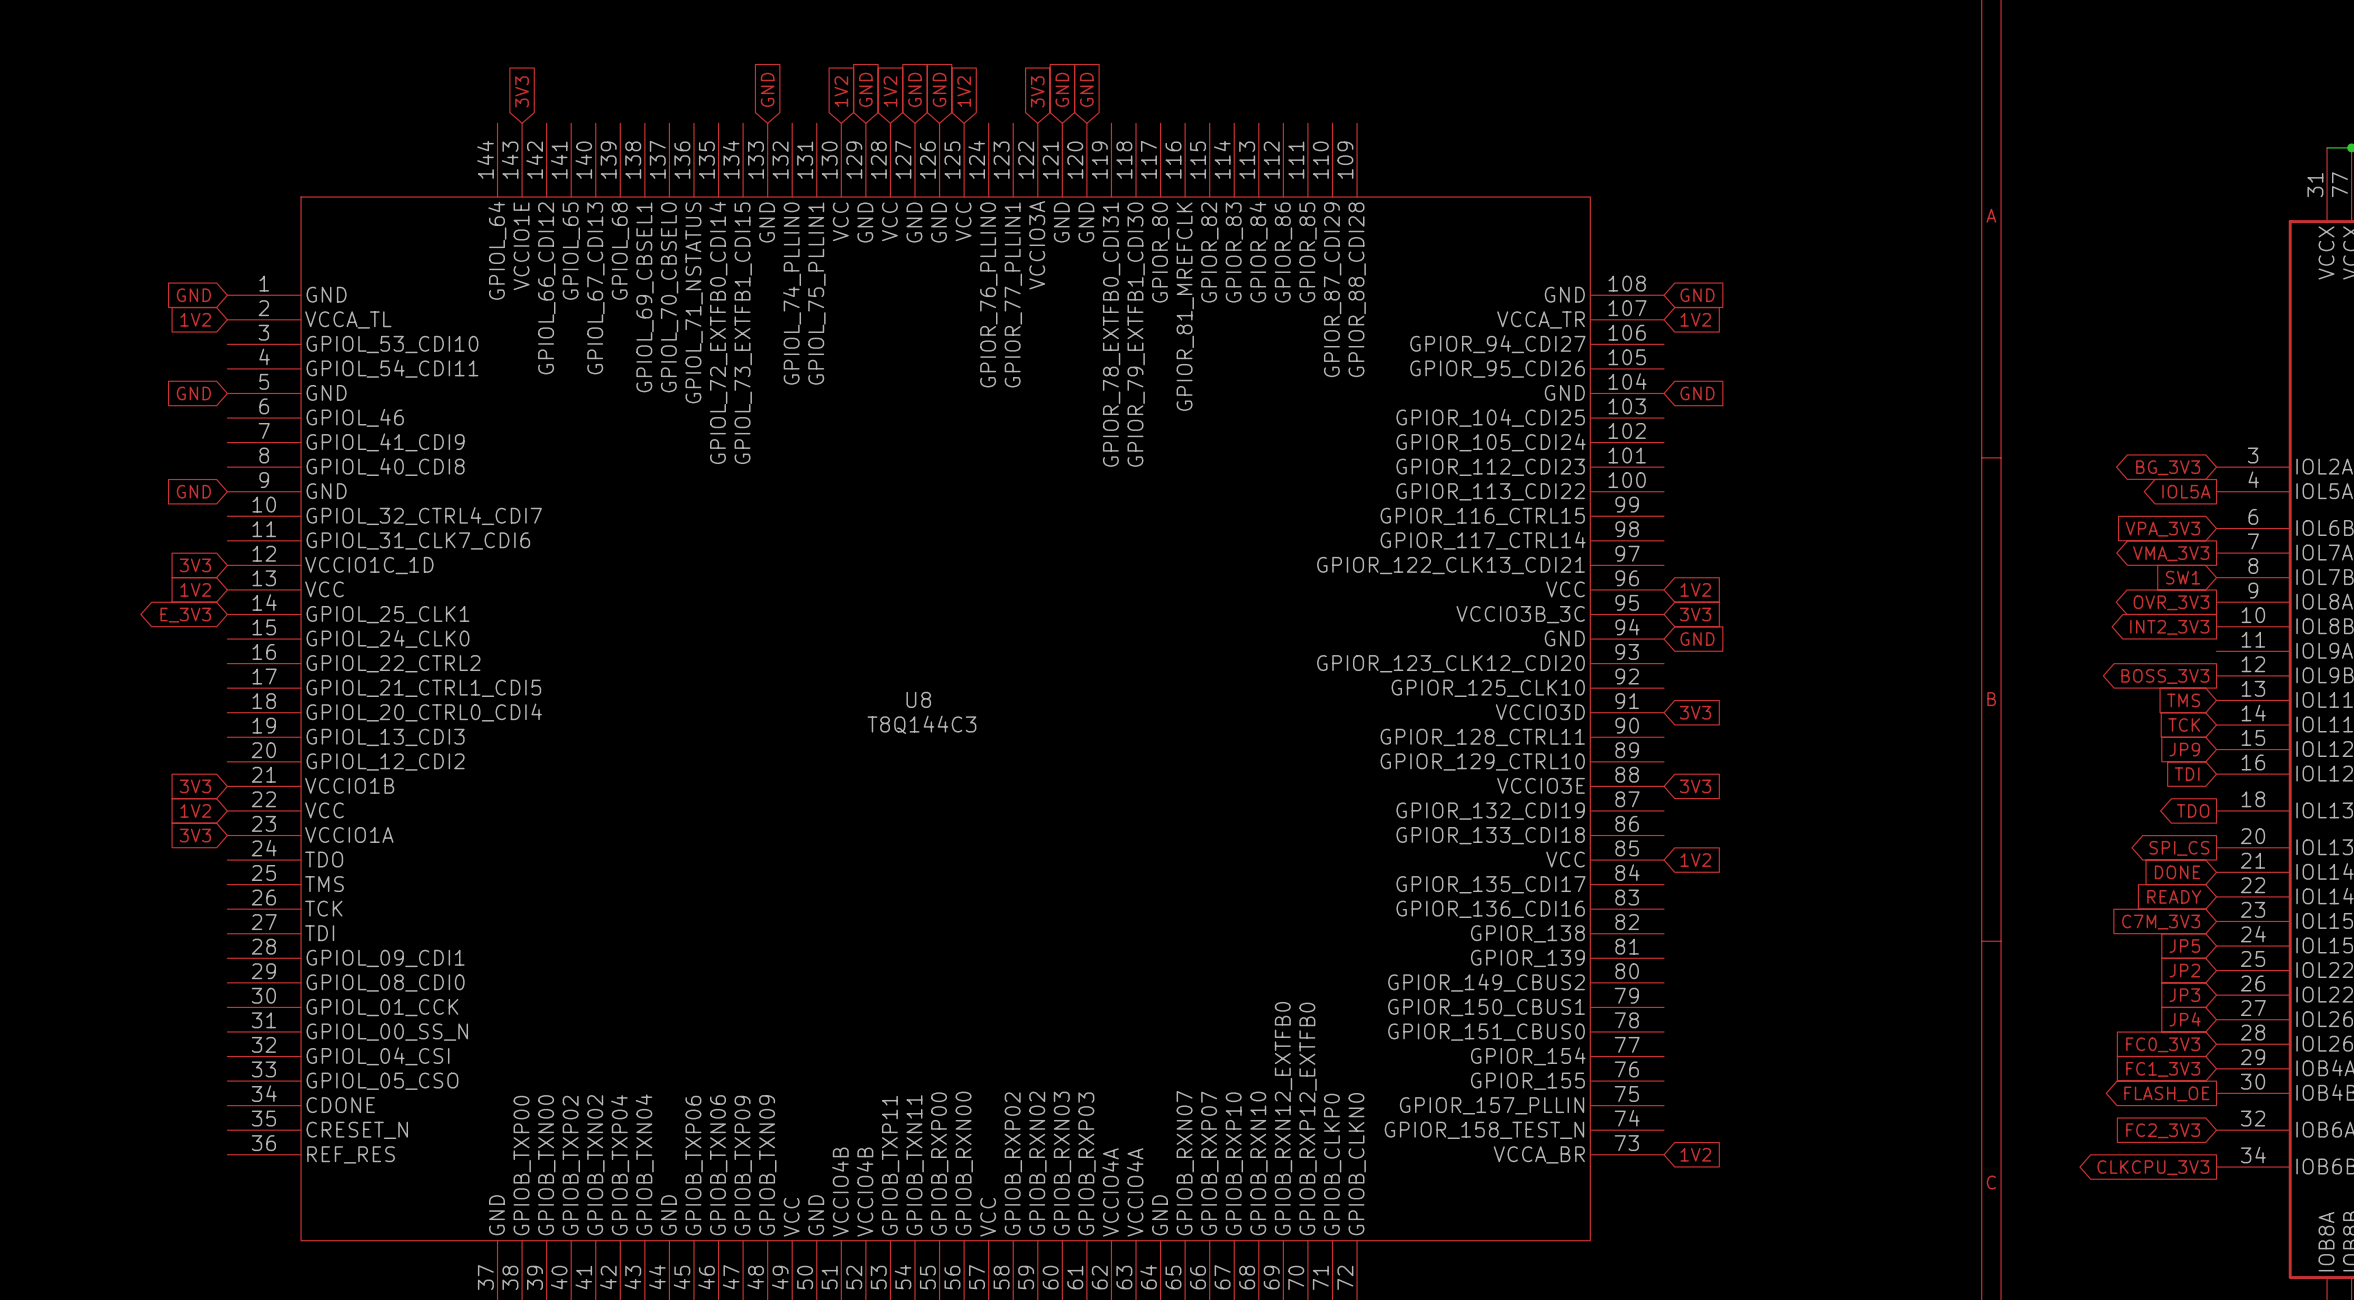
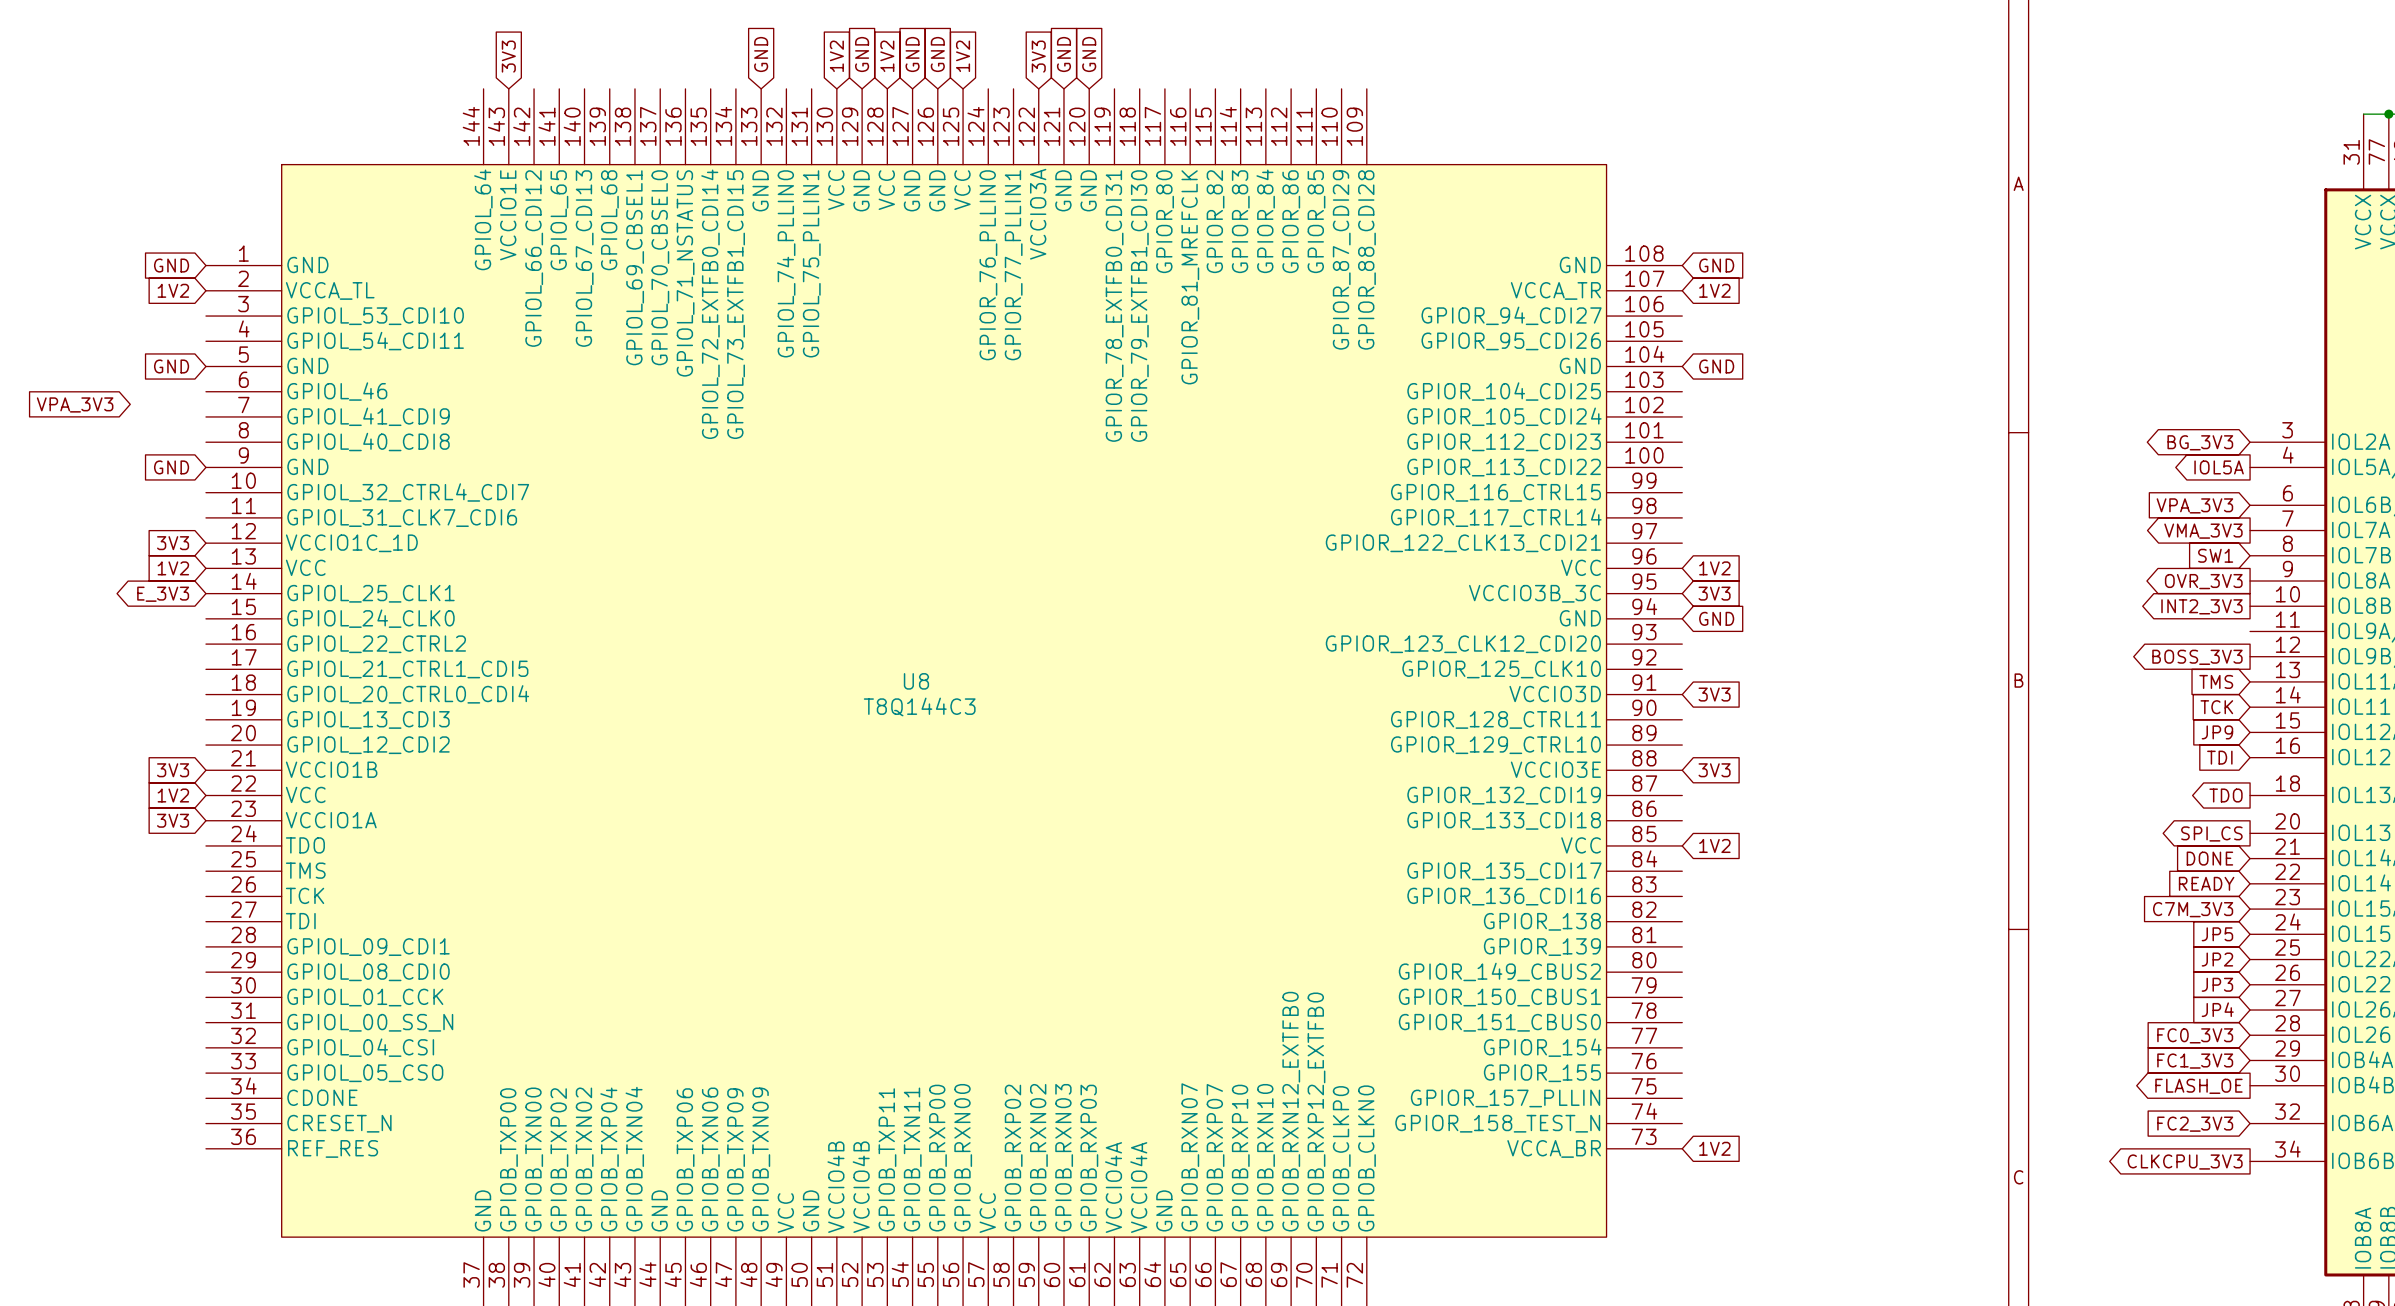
global label: none -> VPA_3V3 (75, 404)

